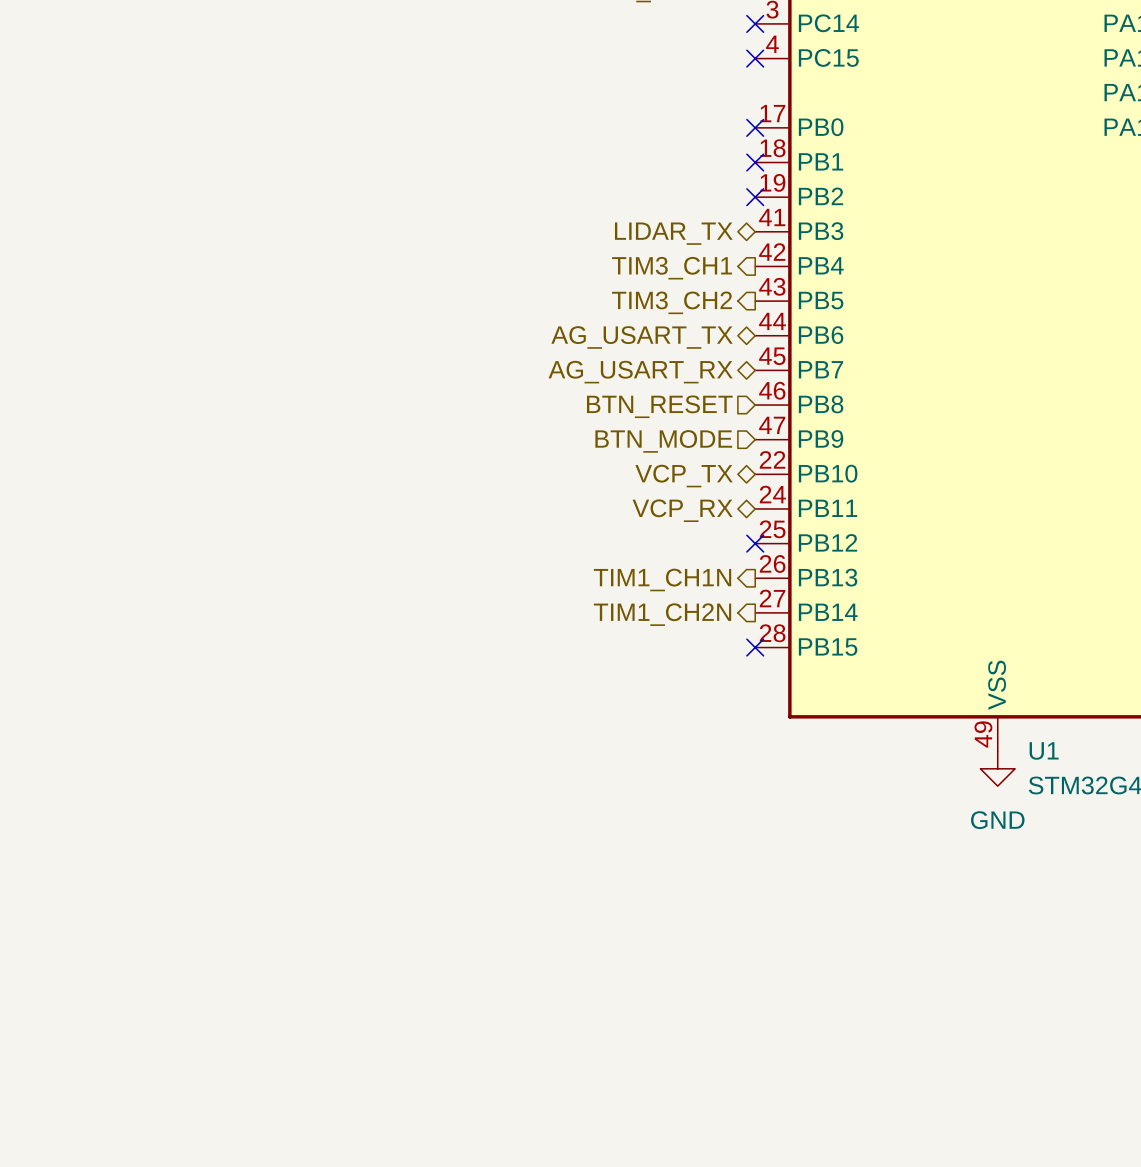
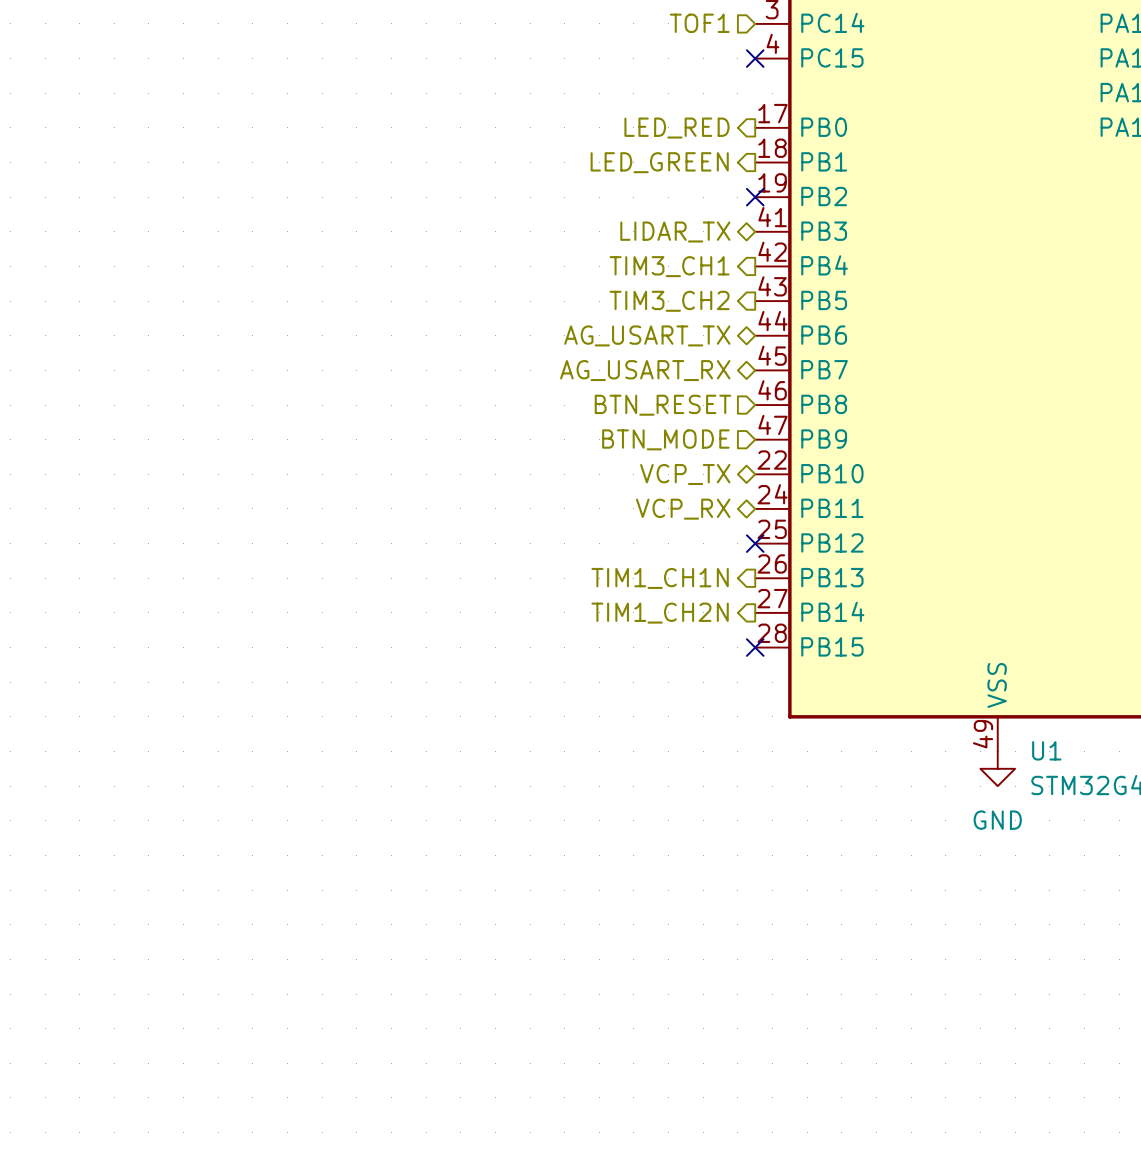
hierarchical label: none -> TOF1 (699, 23)
no-connect mark: (755, 23) -> none
no-connect mark: (755, 127) -> none
hierarchical label: none -> LED_RED (677, 128)
no-connect mark: (755, 162) -> none
hierarchical label: none -> LED_GREEN (659, 162)

